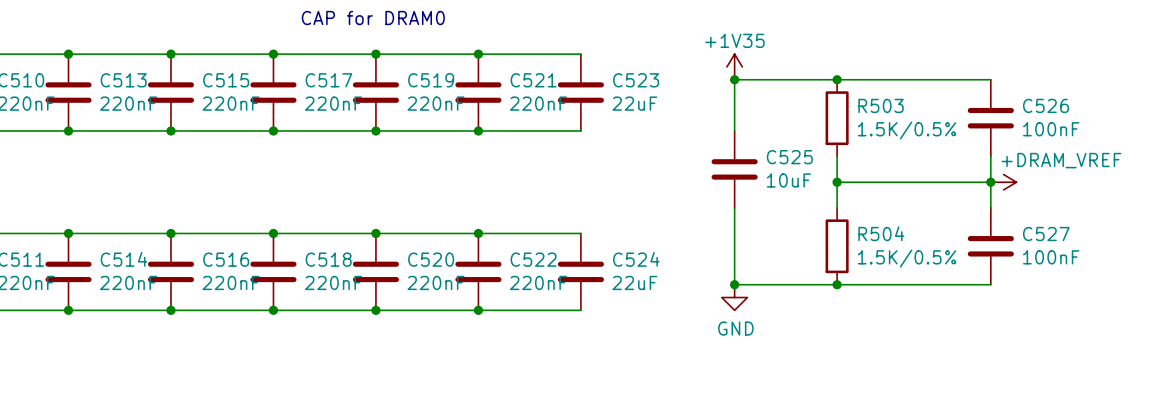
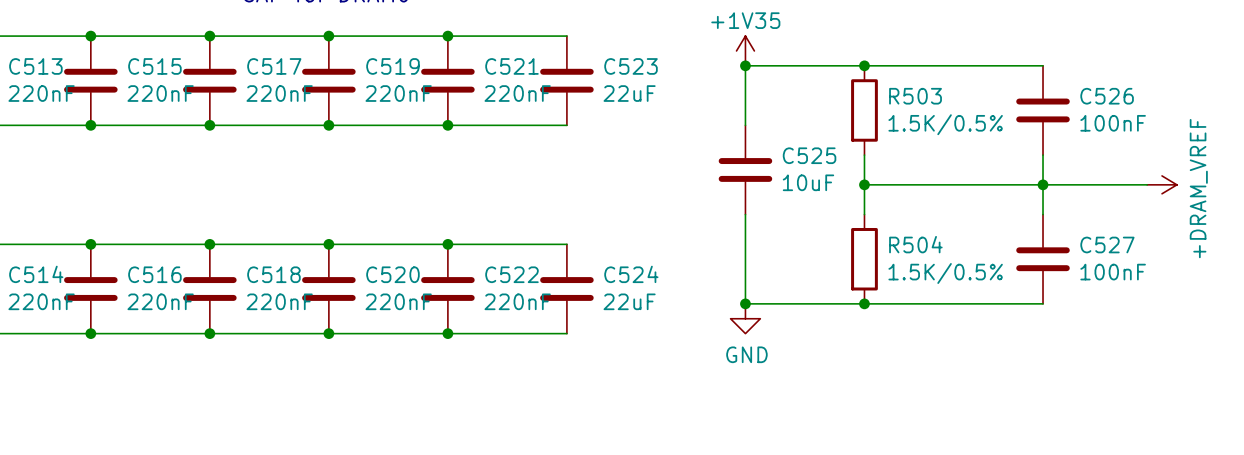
power symbol text rotation: 0° (1061, 160) -> 90° counterclockwise (1198, 188)
wire: none -> (1043, 184) (1147, 184)
power symbol position: +DRAM_VREF (1003, 182) -> +DRAM_VREF (1162, 184)

